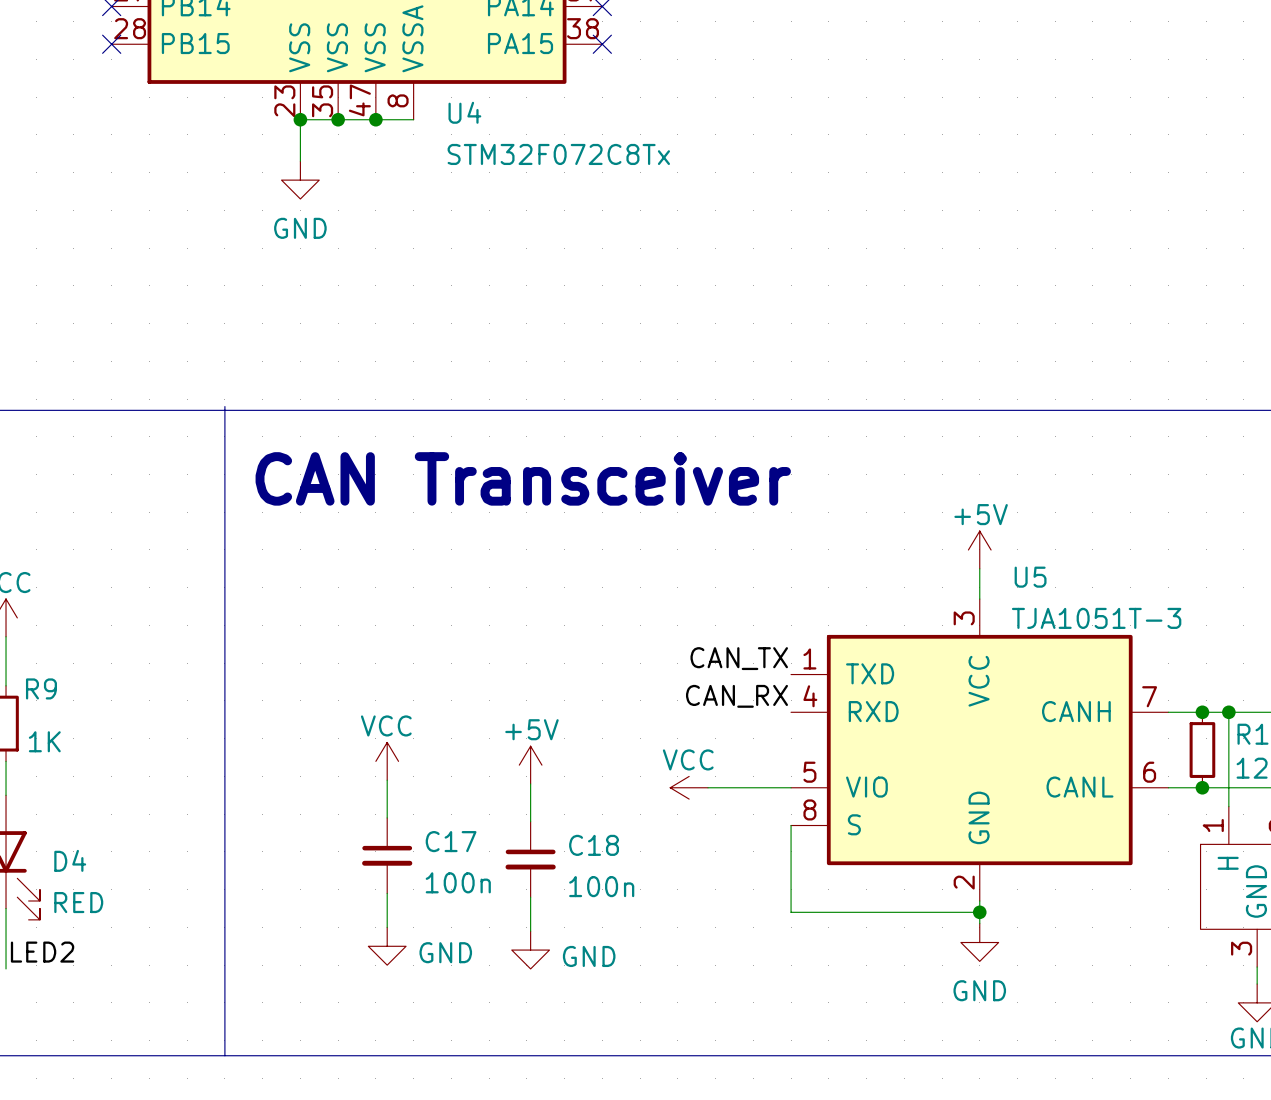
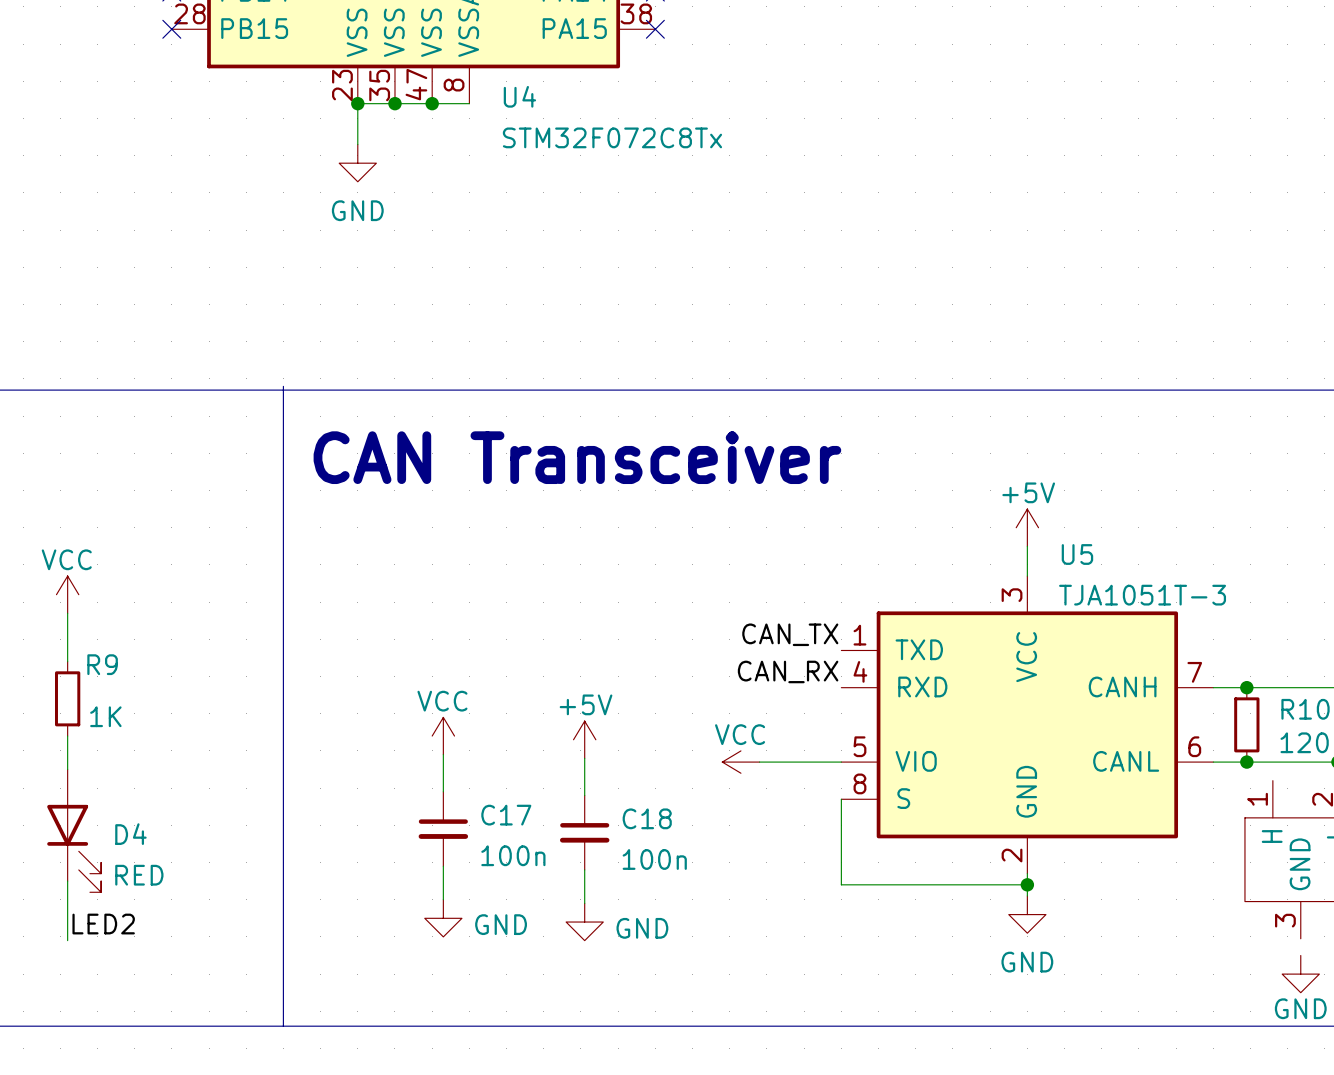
wire: (1228, 712) (1228, 806) -> none
junction: (1228, 712) -> none
wire: (1257, 967) (1257, 984) -> none

